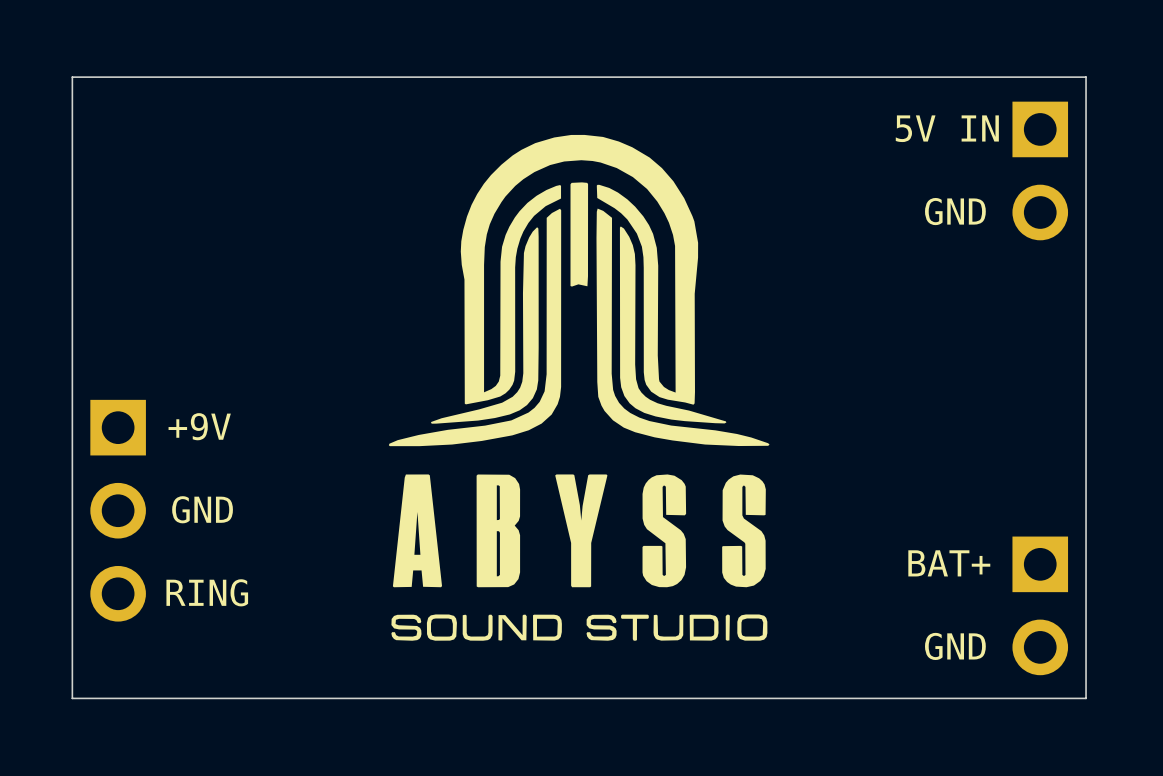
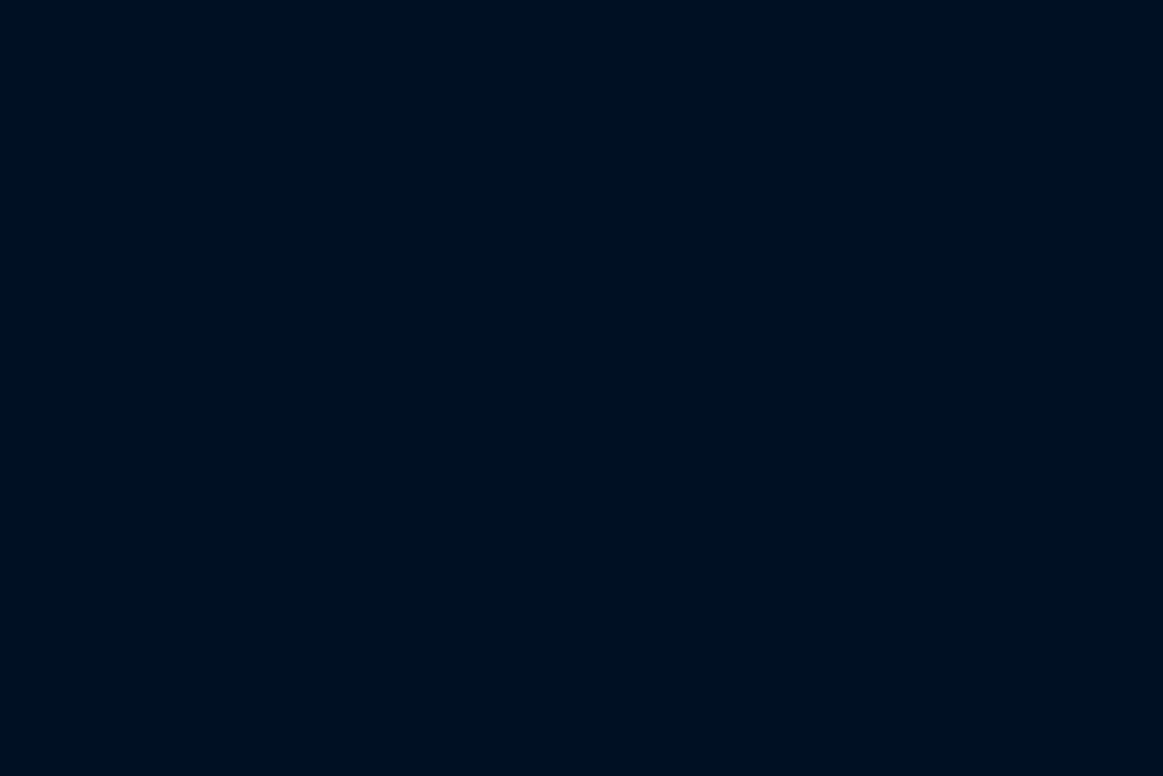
board edge: (1086, 77) (72, 77) (72, 698) (1086, 698) (1086, 77) -> none
text: 5V IN (947, 128) -> none
drawing: [388, 134, 770, 641] -> none
part: (1040, 170) -> none
text: GND (955, 211) -> none
text: +9V (199, 426) -> none
text: GND (202, 509) -> none
part: (118, 510) -> none
text: BAT+ (949, 563) -> none
text: RING (207, 592) -> none
part: (1040, 605) -> none
text: GND (955, 646) -> none

